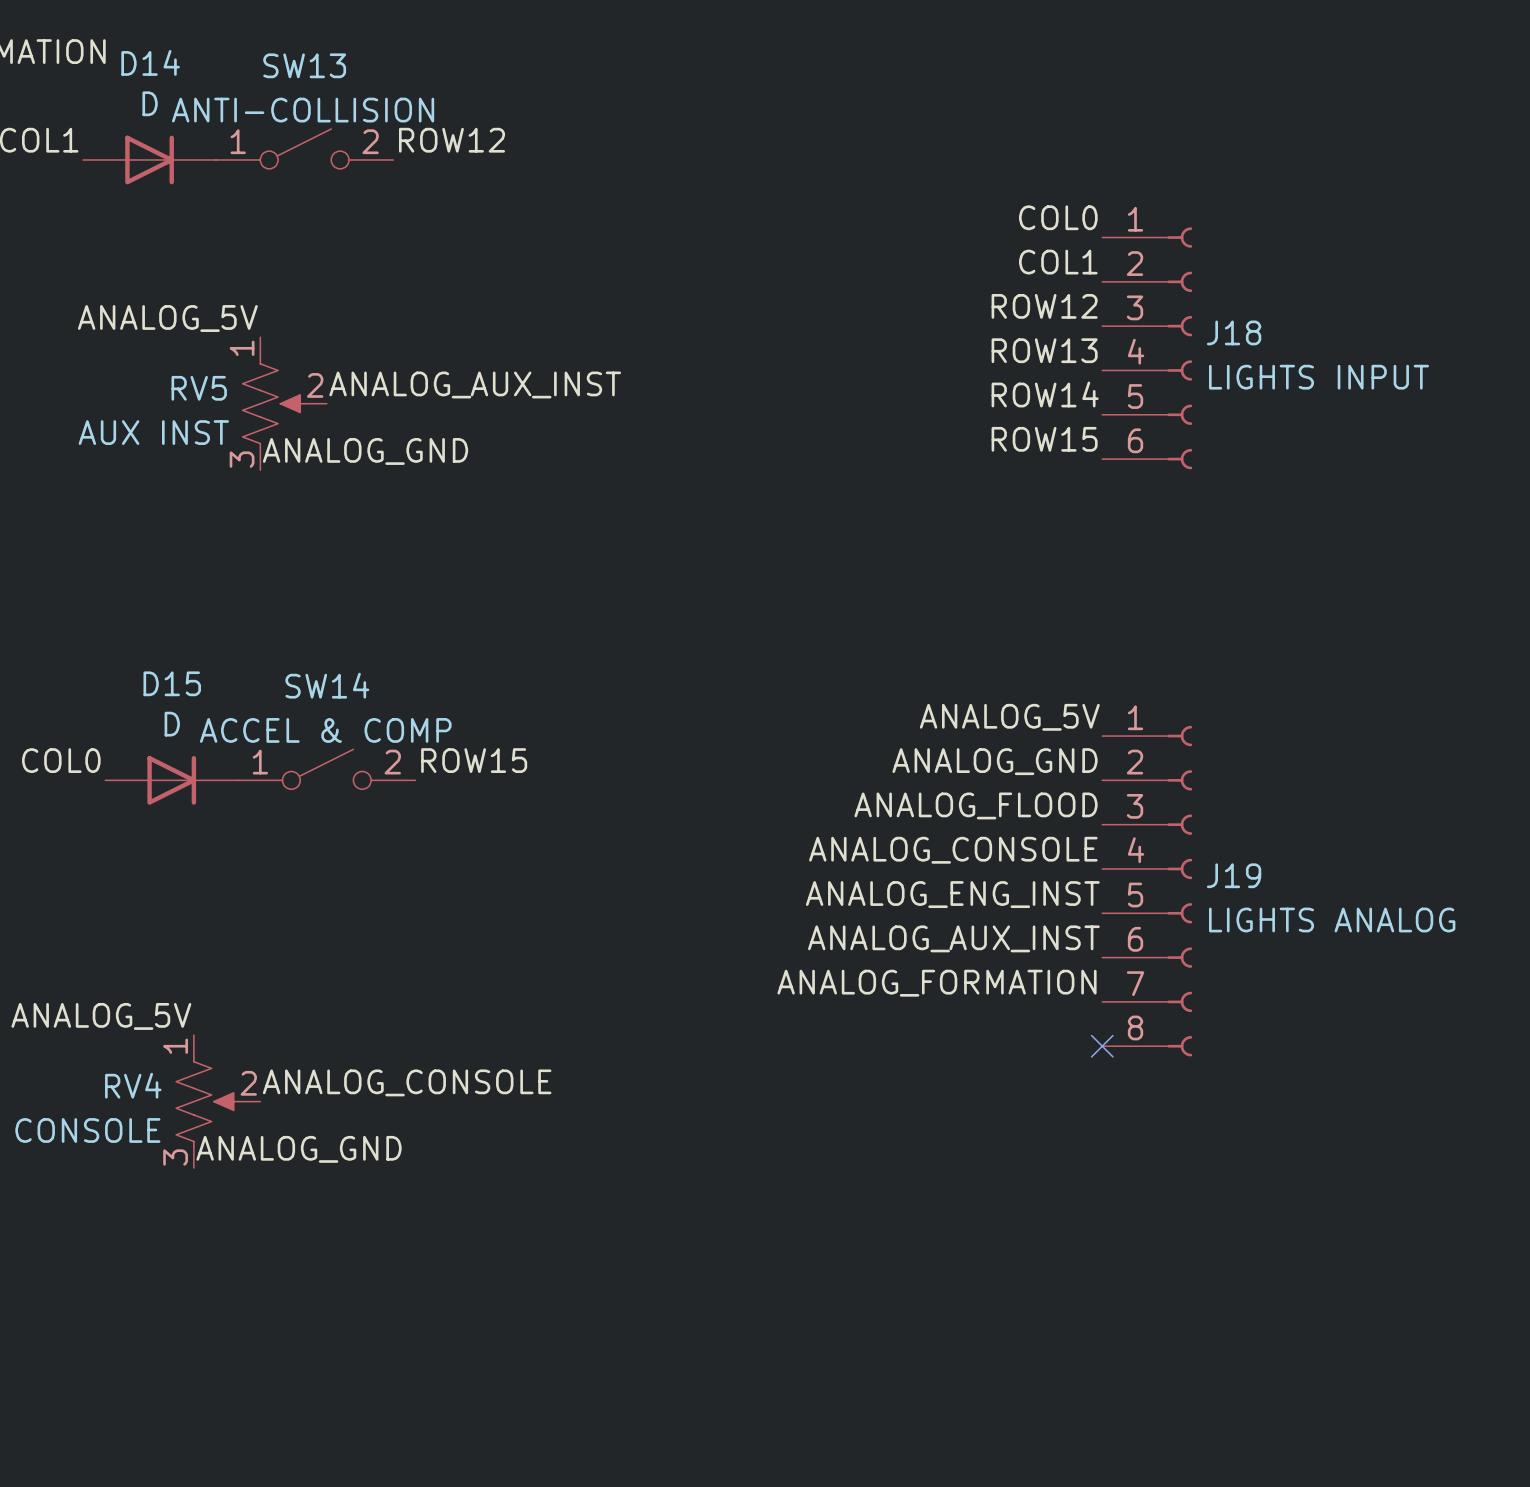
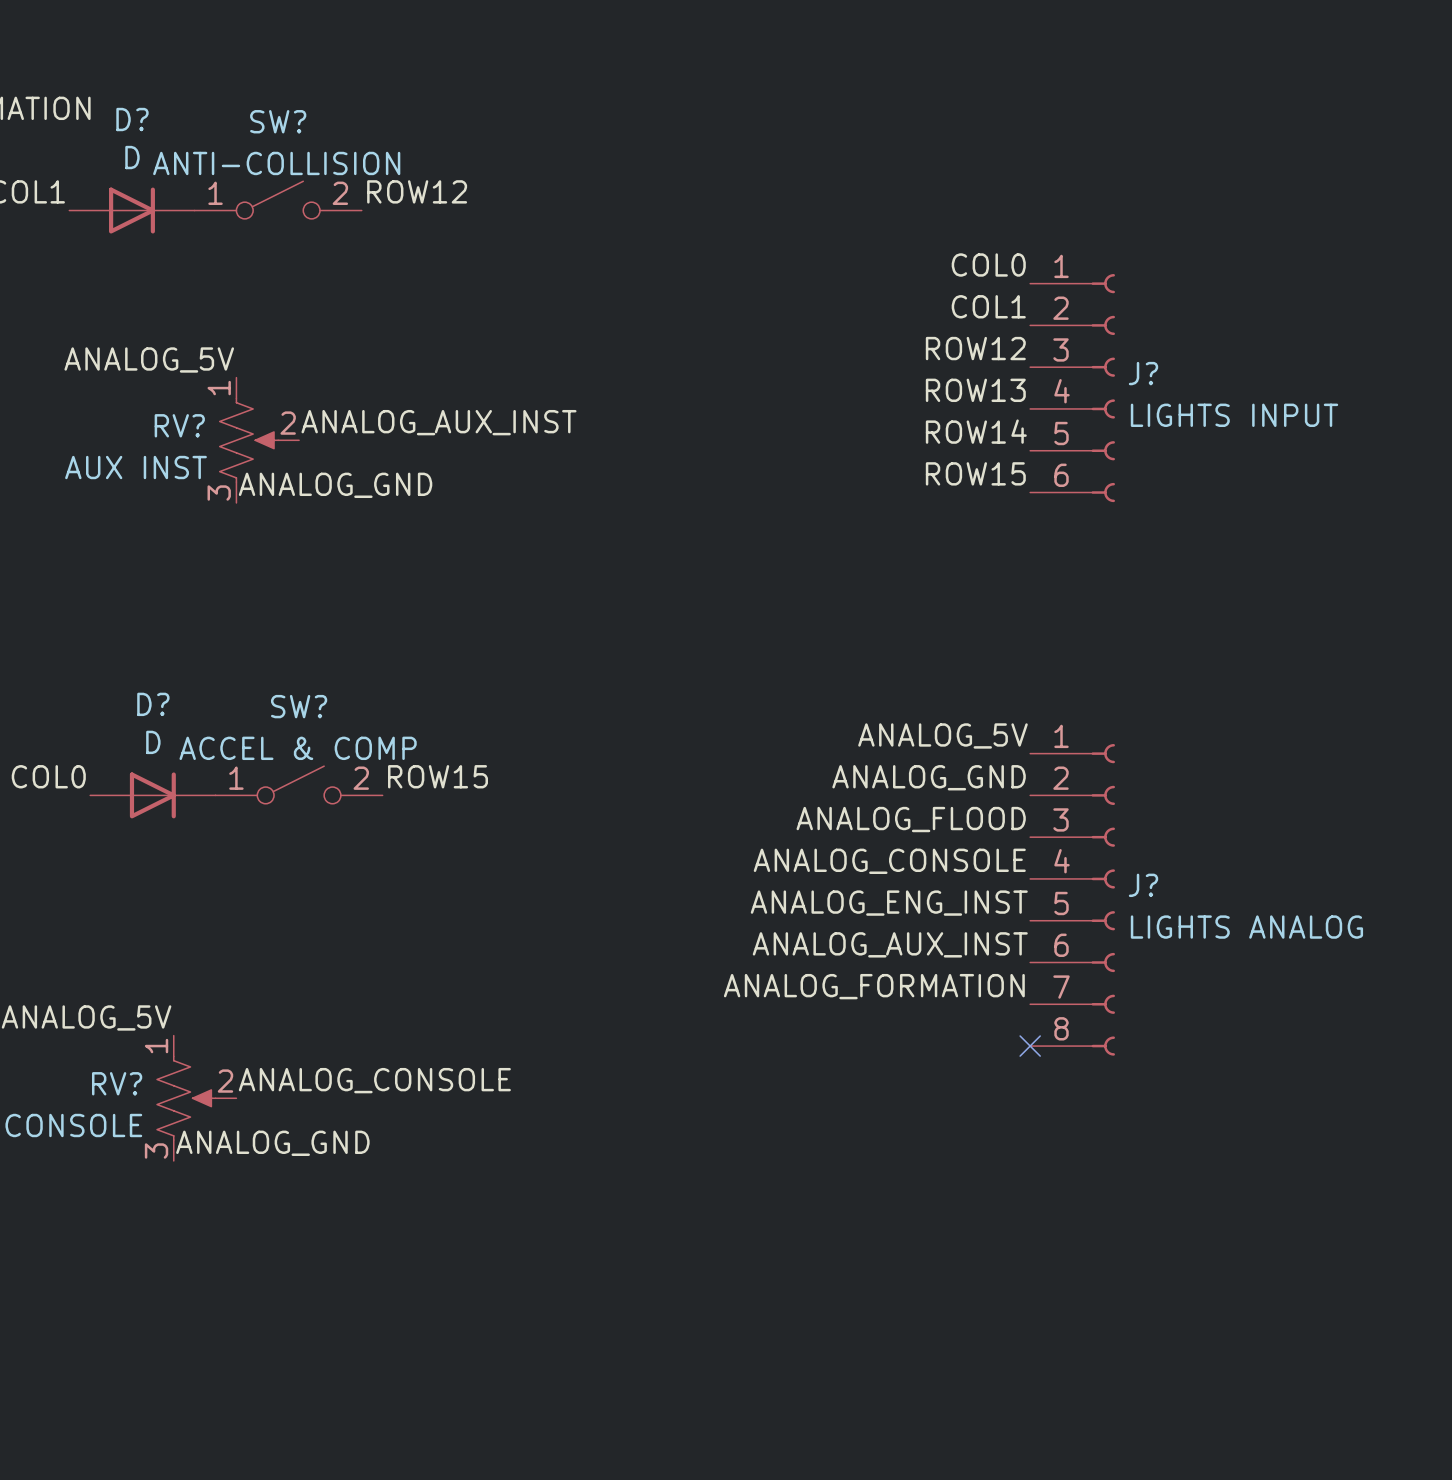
D14 name: D14 (150, 62) -> D? (132, 119)
SW13 name: SW13 (304, 65) -> SW? (278, 121)
J18 name: J18 (1234, 332) -> J? (1143, 373)
RV5 name: RV5 (199, 388) -> RV? (179, 425)
D15 name: D15 (172, 683) -> D? (153, 704)
SW14 name: SW14 (327, 685) -> SW? (299, 706)
J19 name: J19 (1234, 875) -> J? (1143, 885)
RV4 name: RV4 (133, 1085) -> RV? (117, 1083)

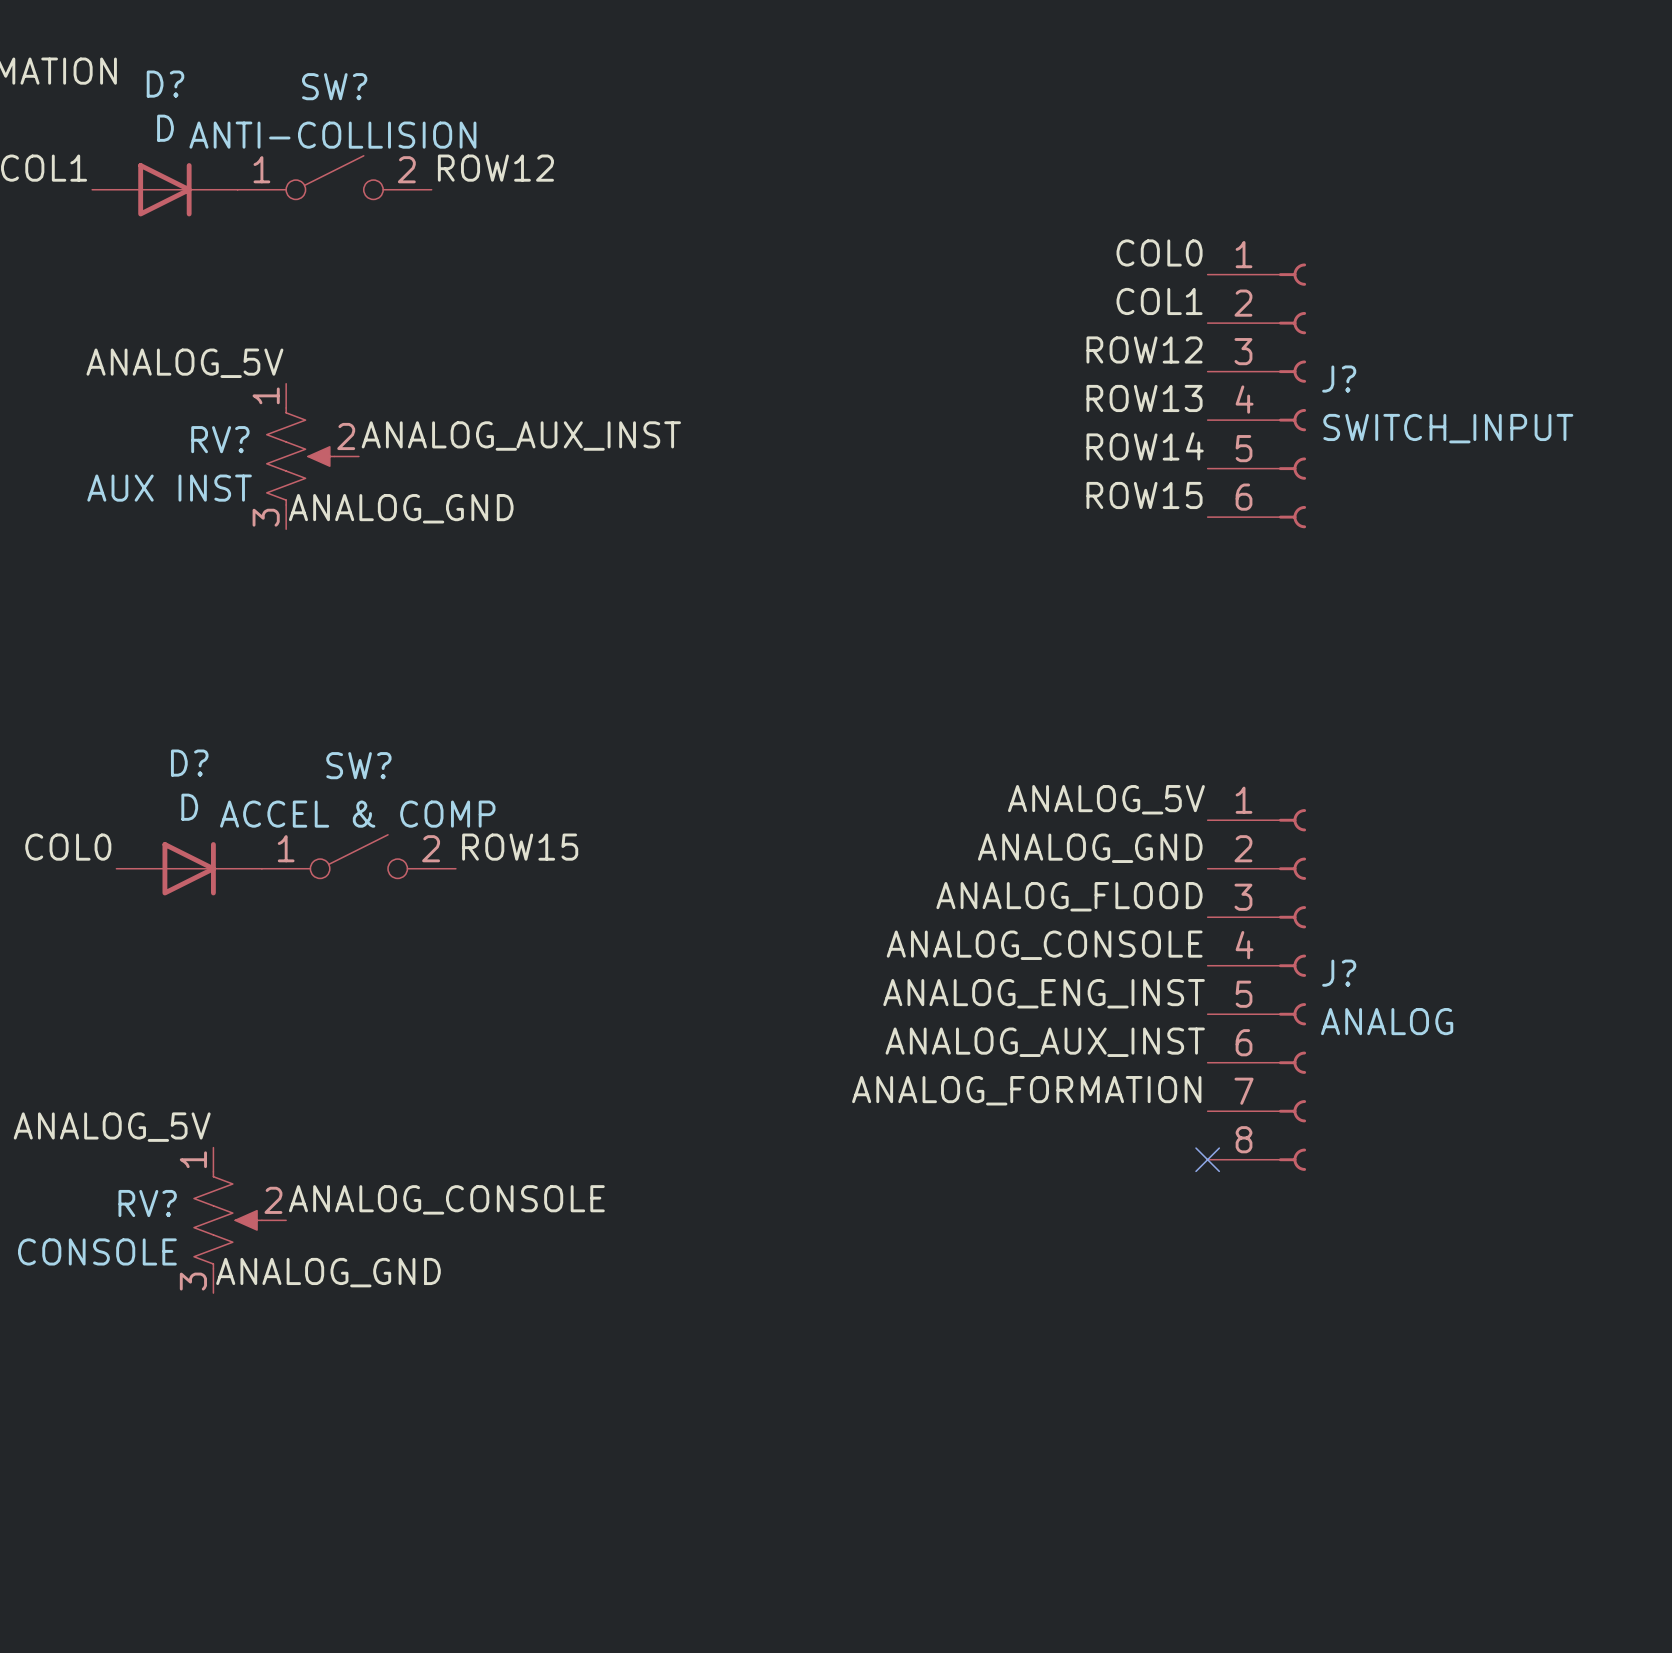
J? value: LIGHTS INPUT (1234, 415) -> SWITCH_INPUT (1448, 428)
J? value: LIGHTS ANALOG (1246, 927) -> ANALOG (1387, 1021)

